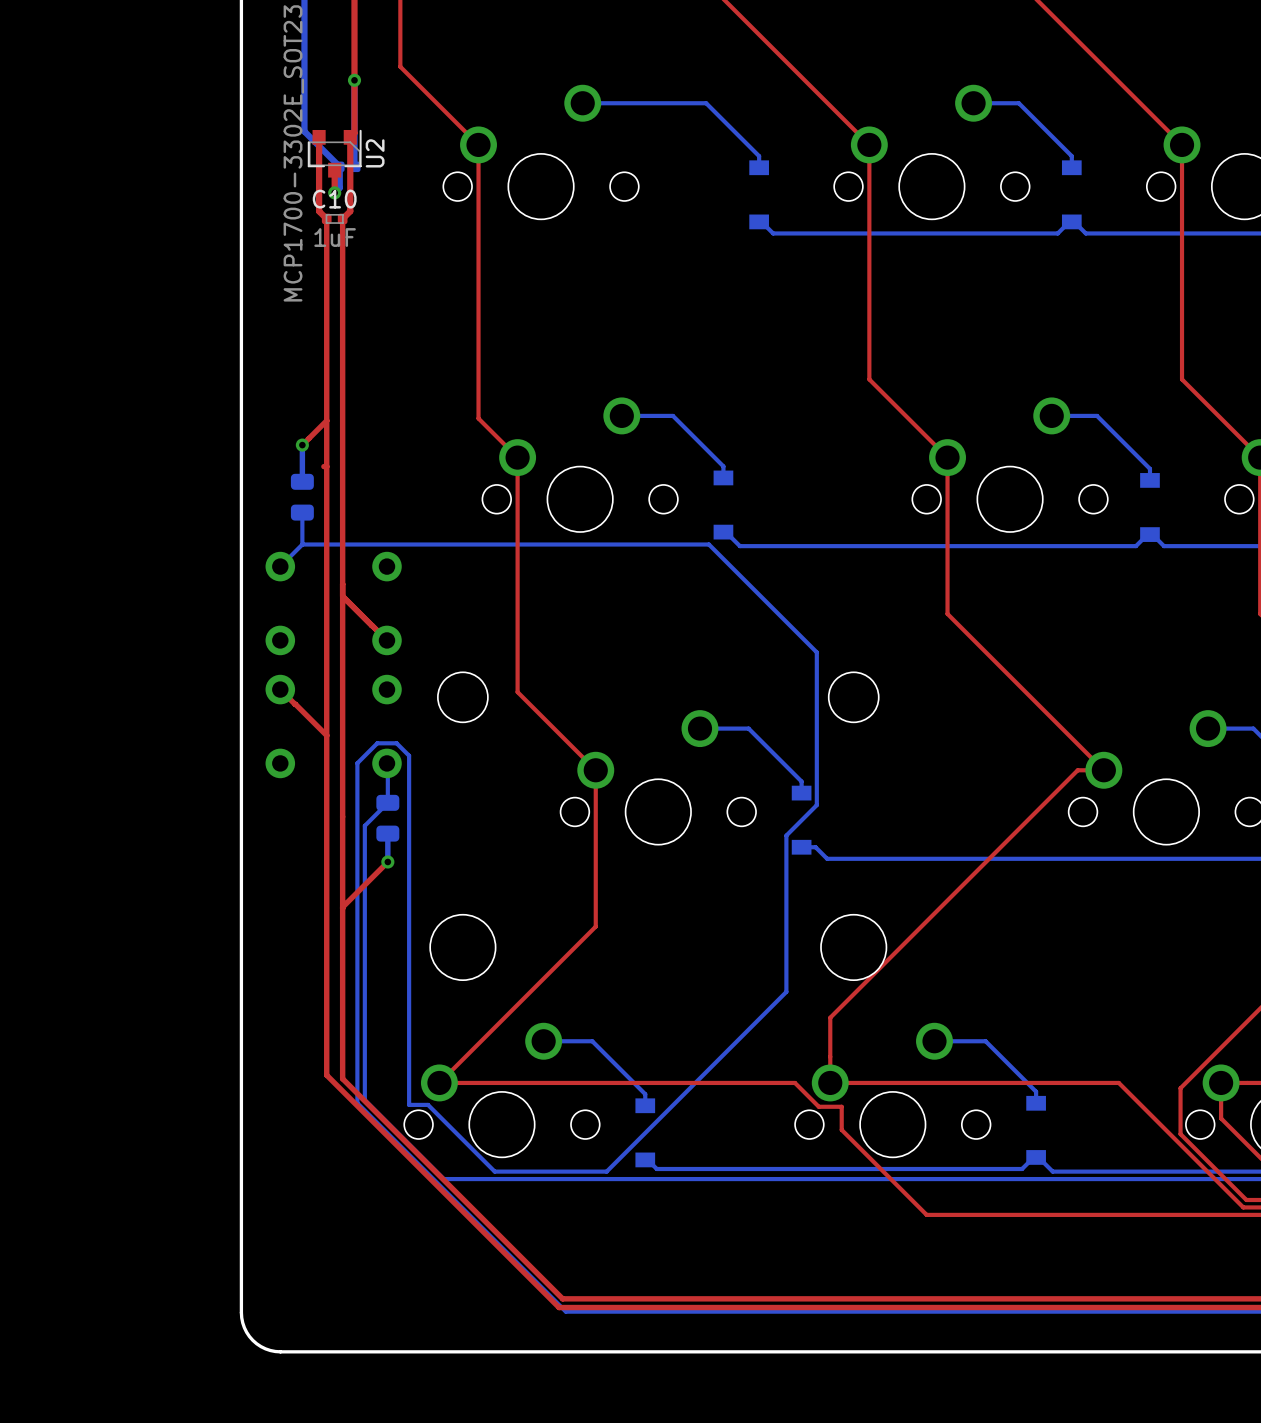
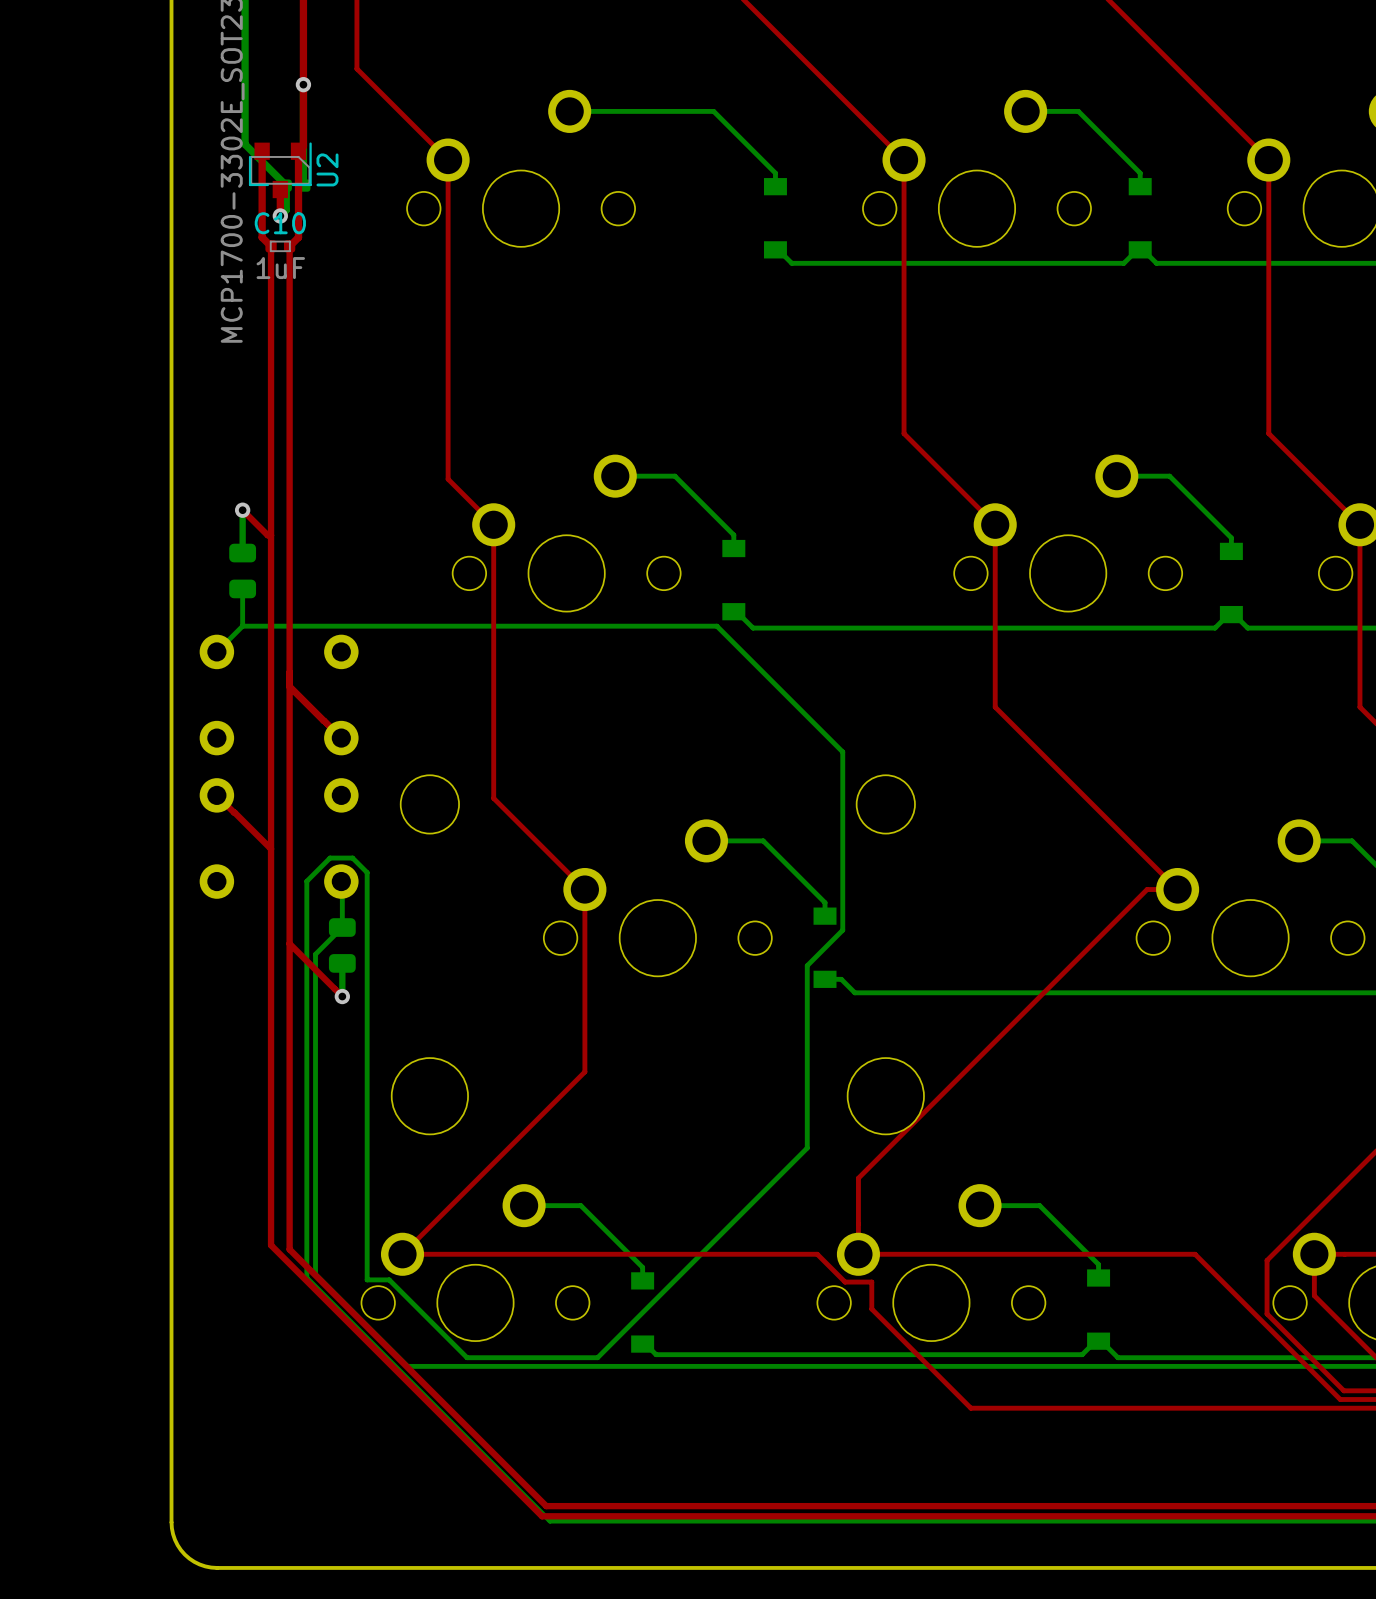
top track: (326, 420) (302, 445) -> (267, 535) (242, 510)
top track: (387, 861) (342, 907) -> (342, 996) (289, 943)

